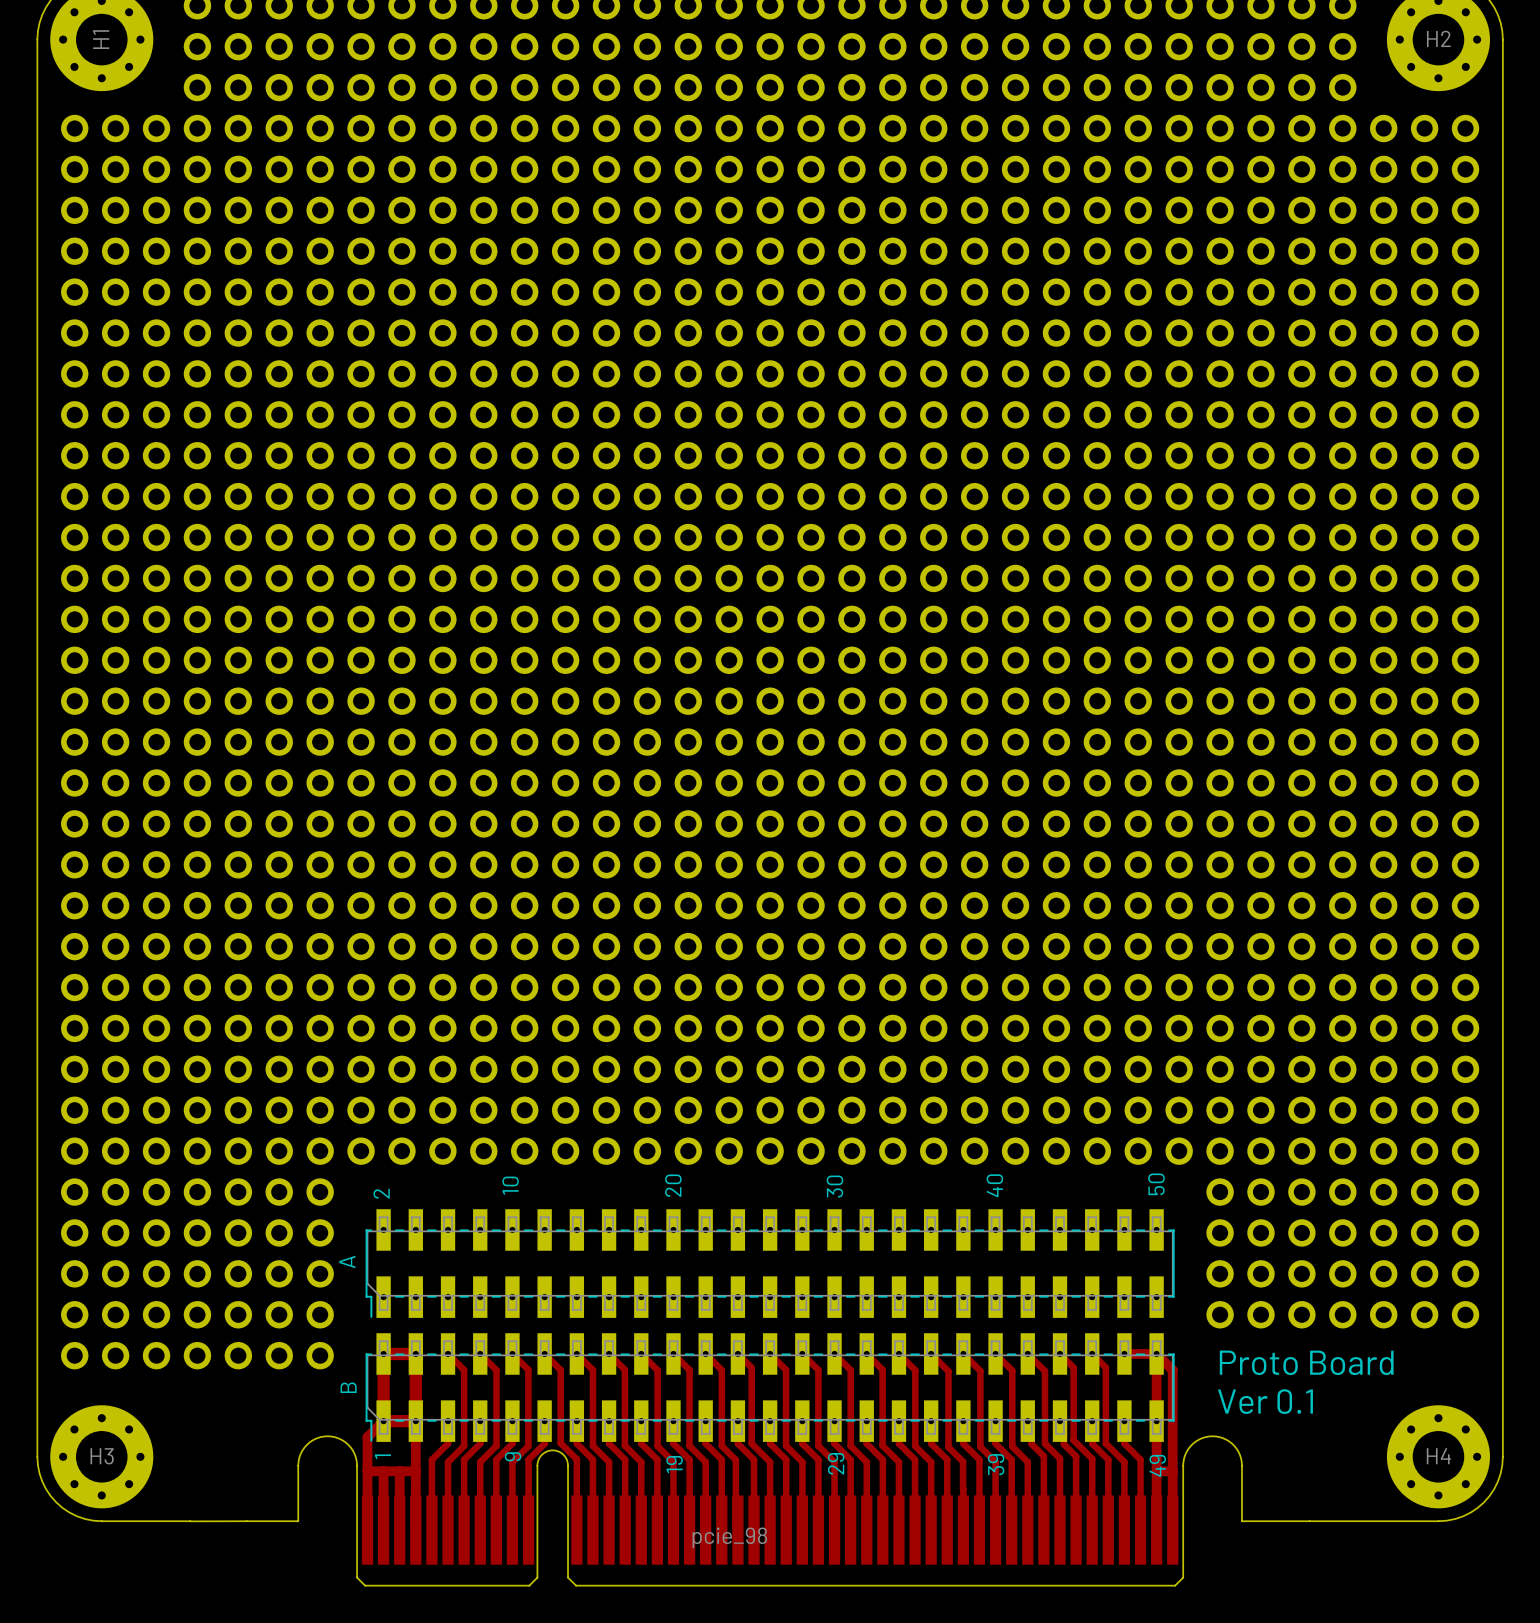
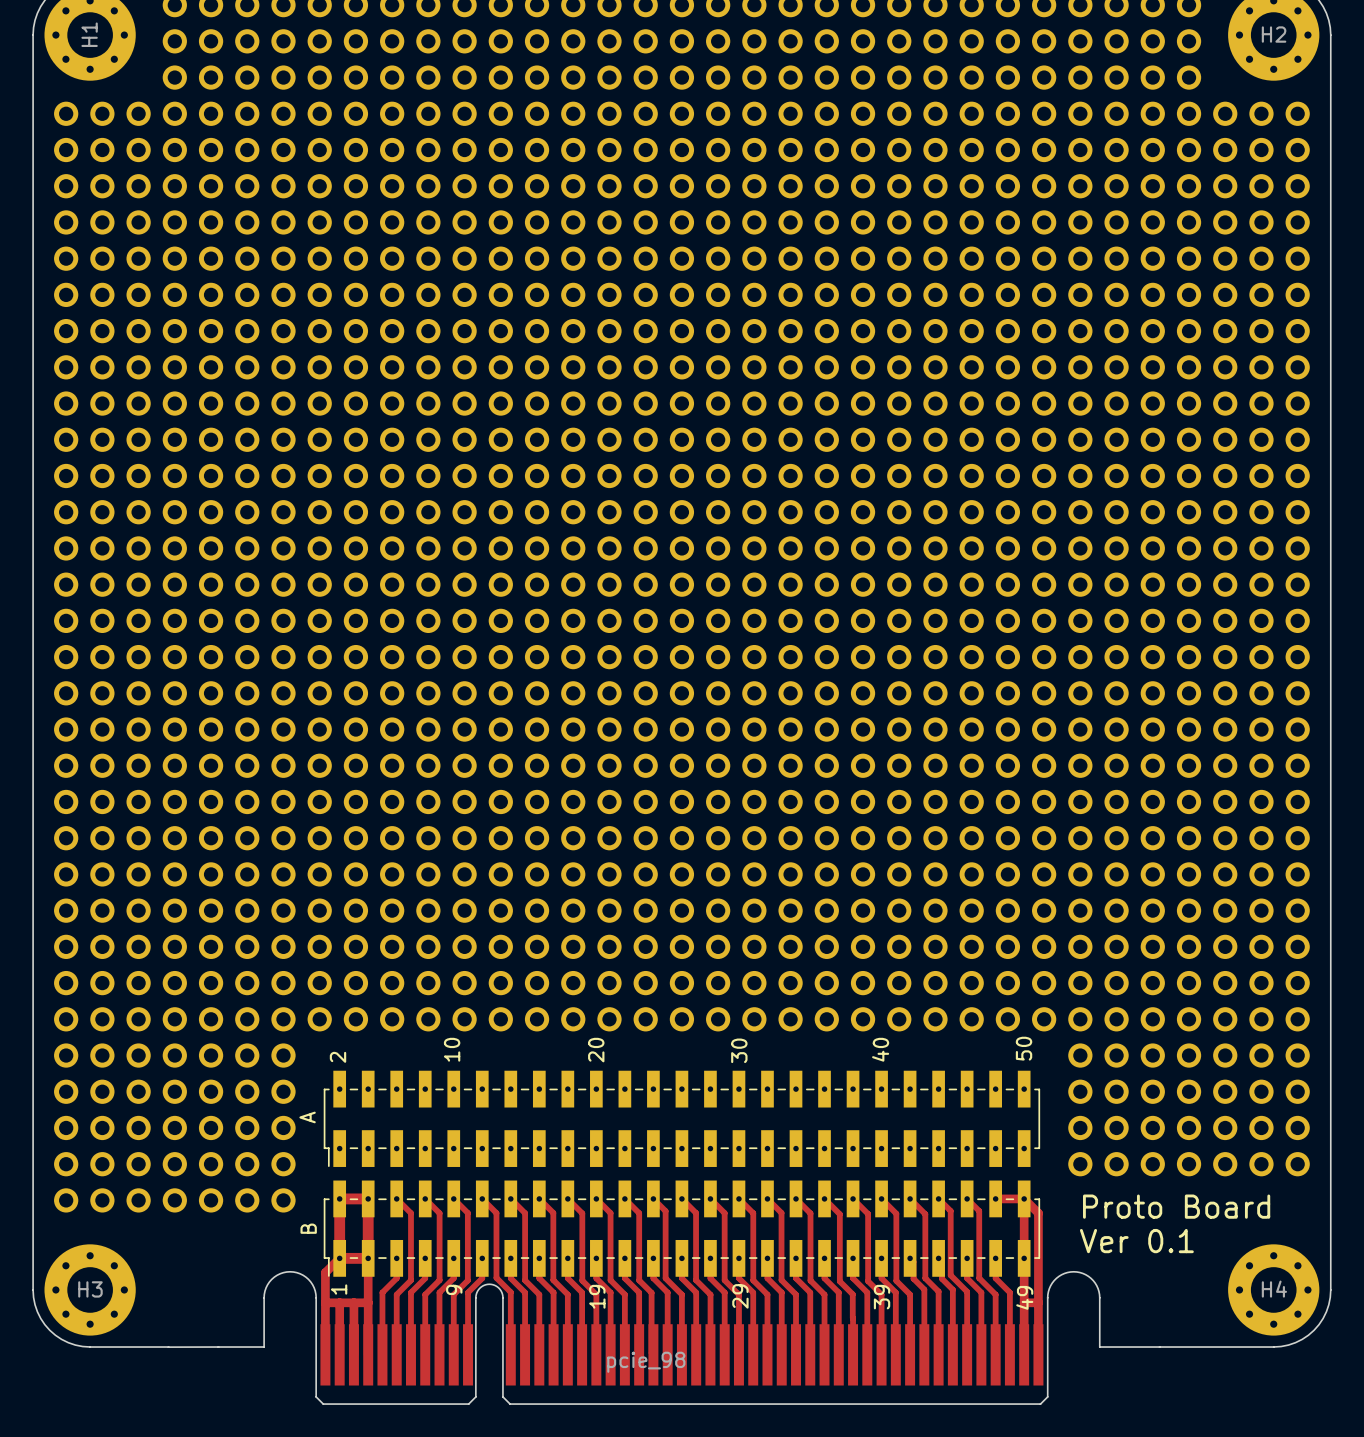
part footprint: [365, 1209, 1175, 1318] -> [323, 1070, 1041, 1167]
part footprint: [365, 1333, 1175, 1442] -> [323, 1180, 1041, 1277]

